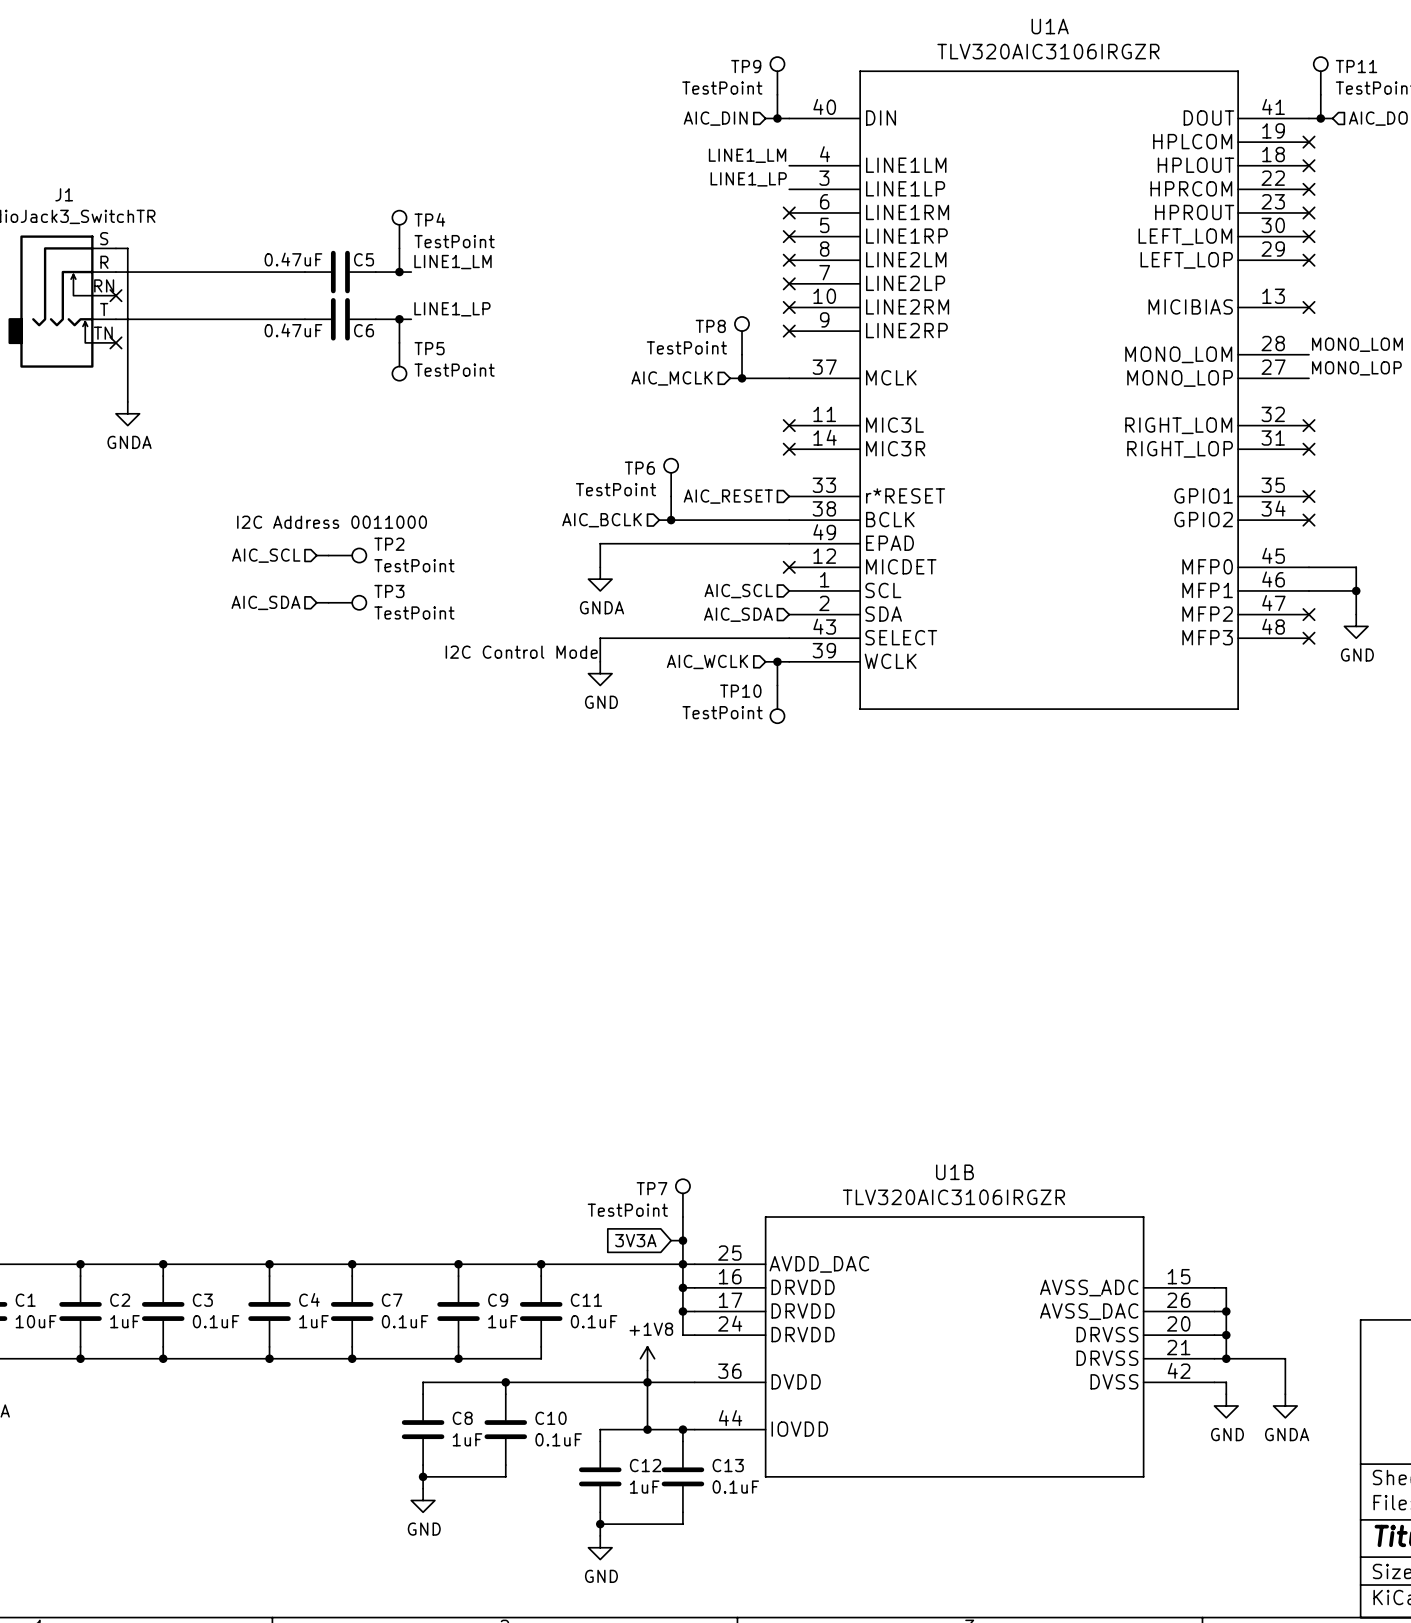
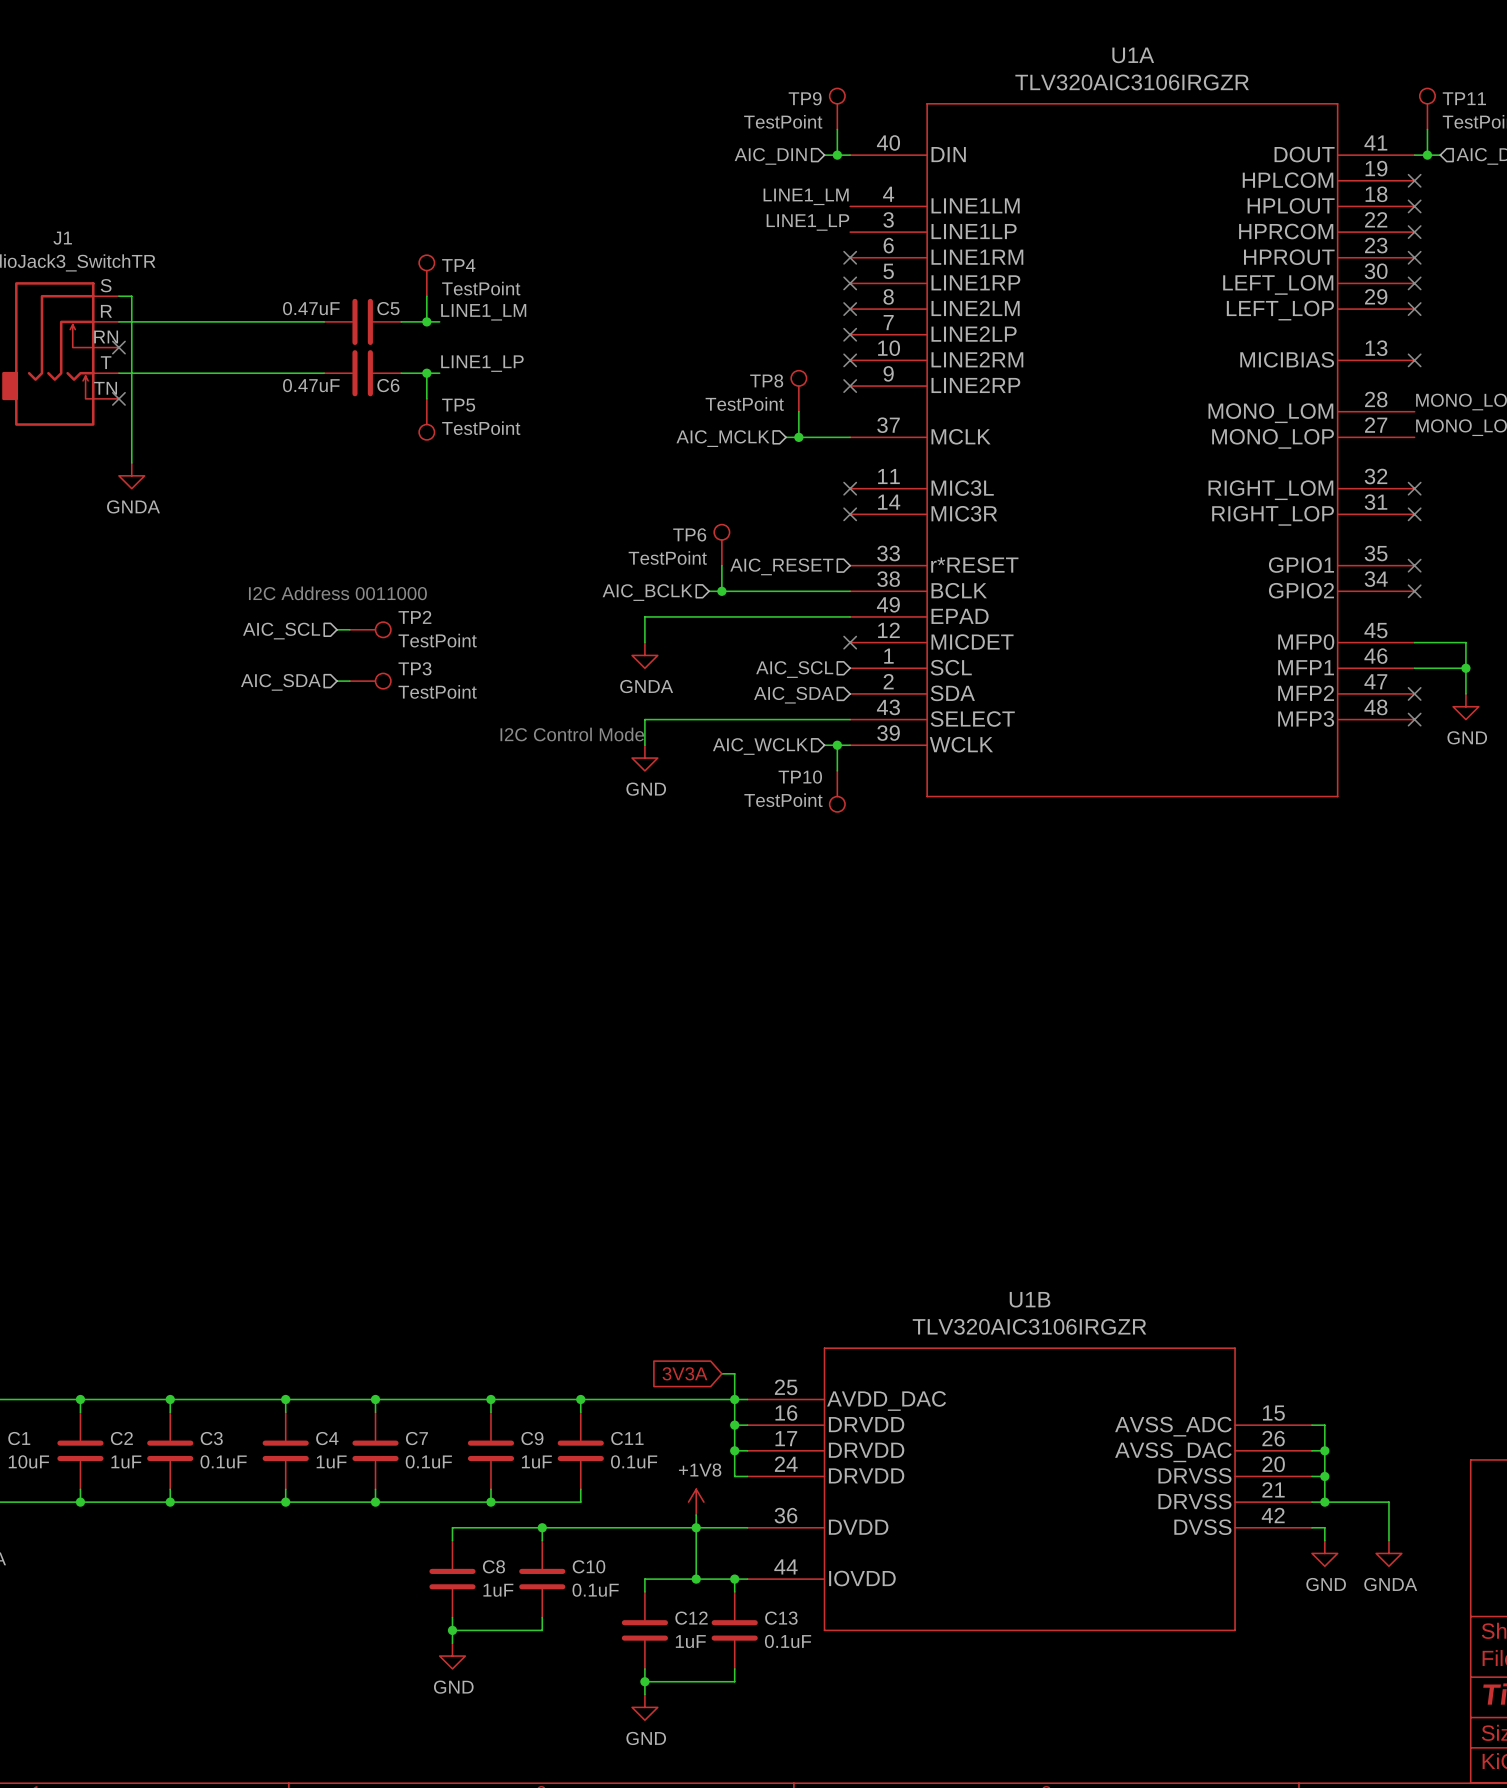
TP7: TestPoint (682, 1198) -> none
wire: (682, 1217) (682, 1240) -> none
junction: (682, 1240) -> none

